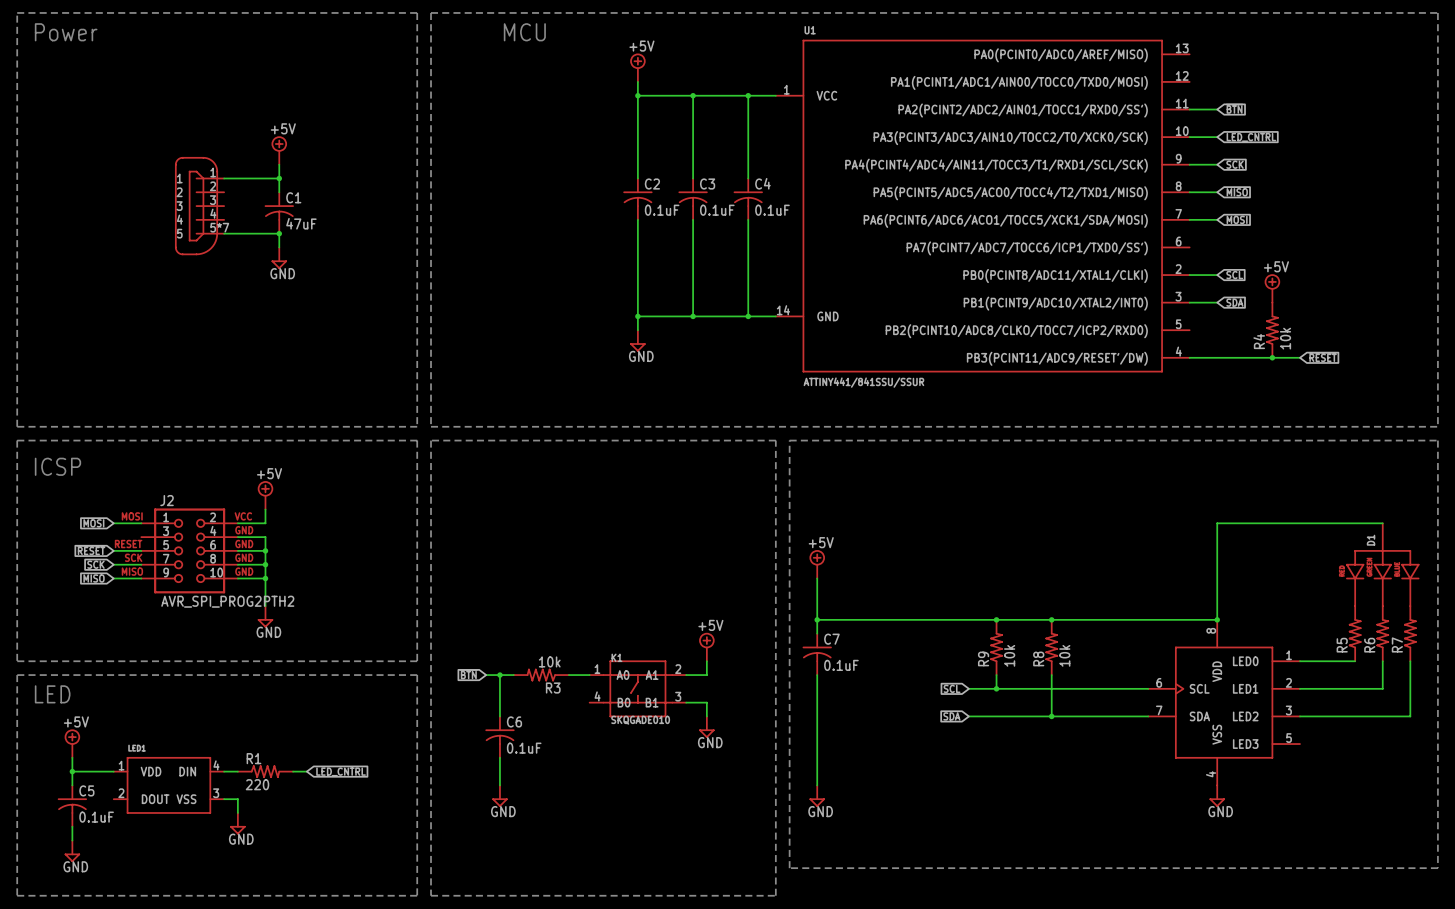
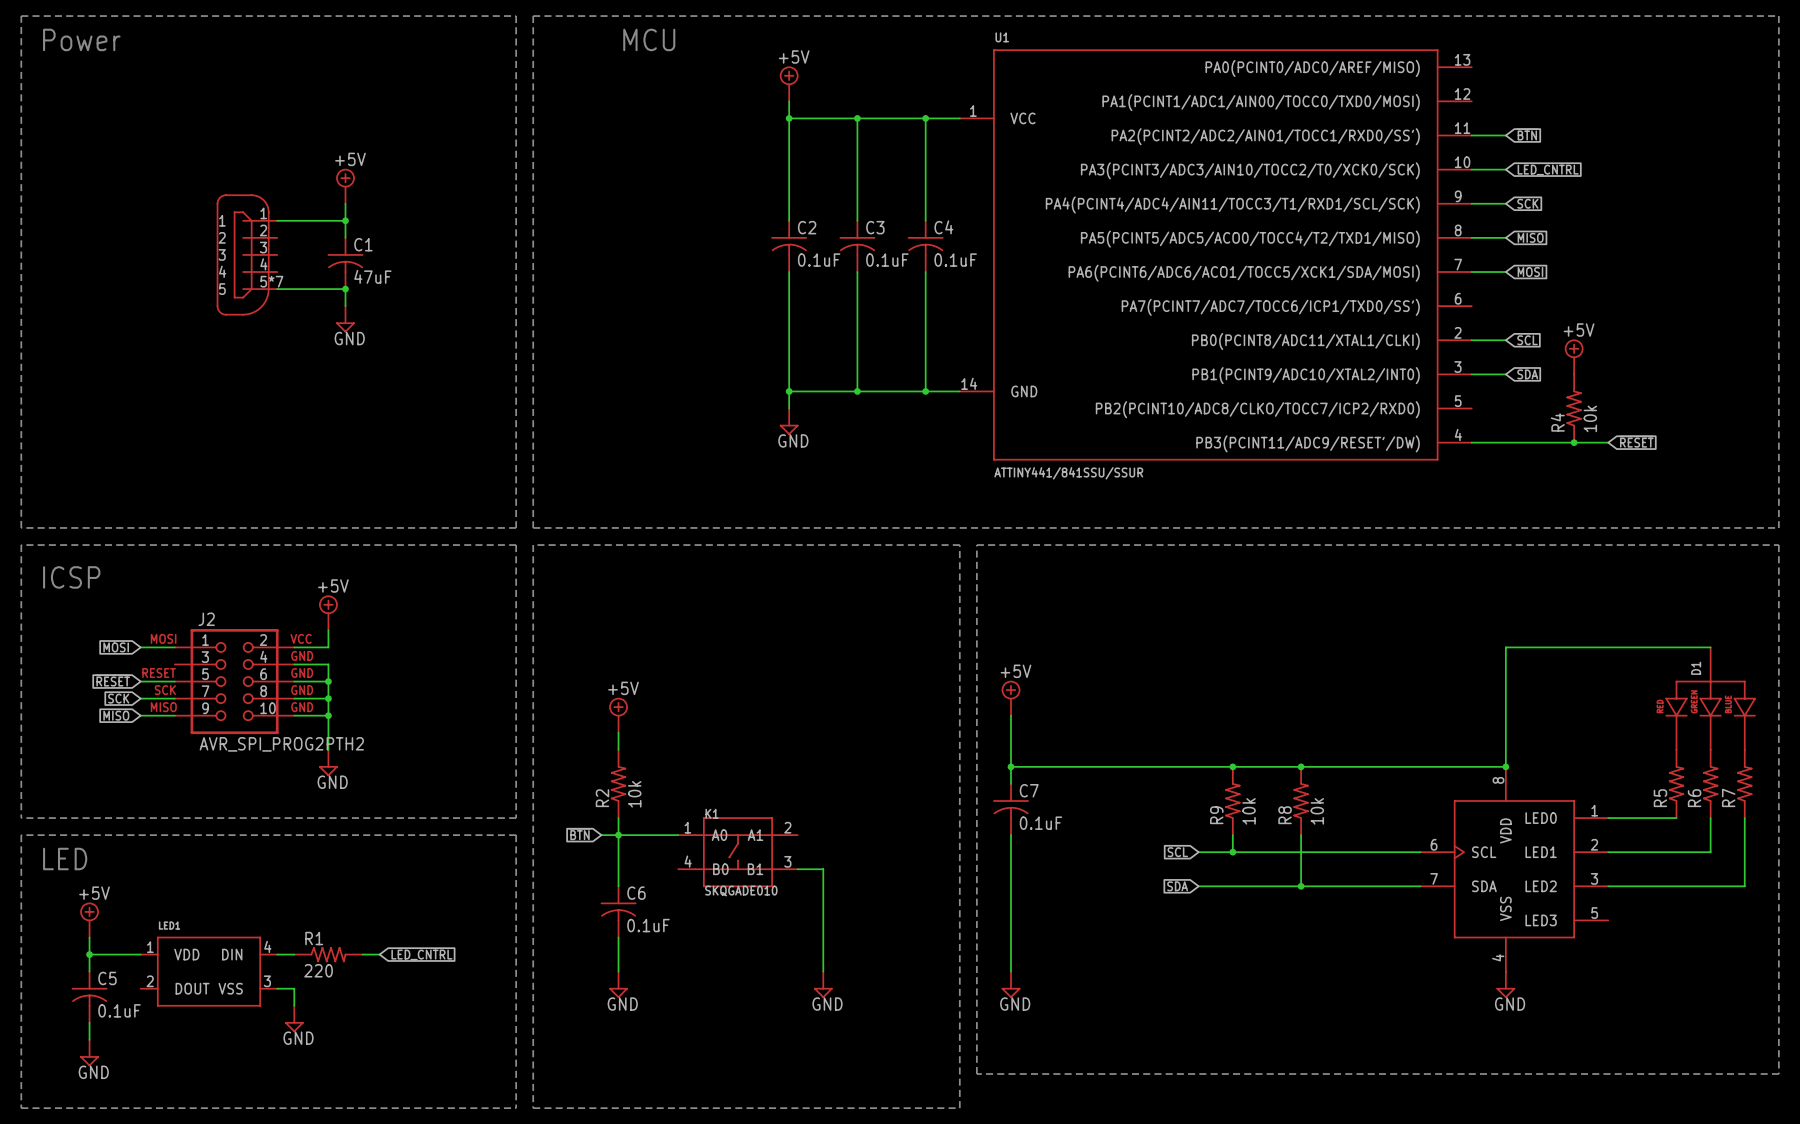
power symbol: none -> +5V (618, 715)
wire: none -> (618, 732) (618, 749)
R2: none -> 10k (618, 783)
power symbol: +5V (706, 647) -> none
wire: none -> (618, 818) (618, 835)
wire: (706, 661) (706, 675) (686, 675) -> none
R3: 10k (541, 675) -> none
K1 position: (637, 688) -> (737, 852)
wire: none -> (797, 869) (823, 869) (823, 971)
wire: (686, 702) (706, 702) (706, 716) -> none
power symbol position: GND (706, 727) -> GND (823, 984)

